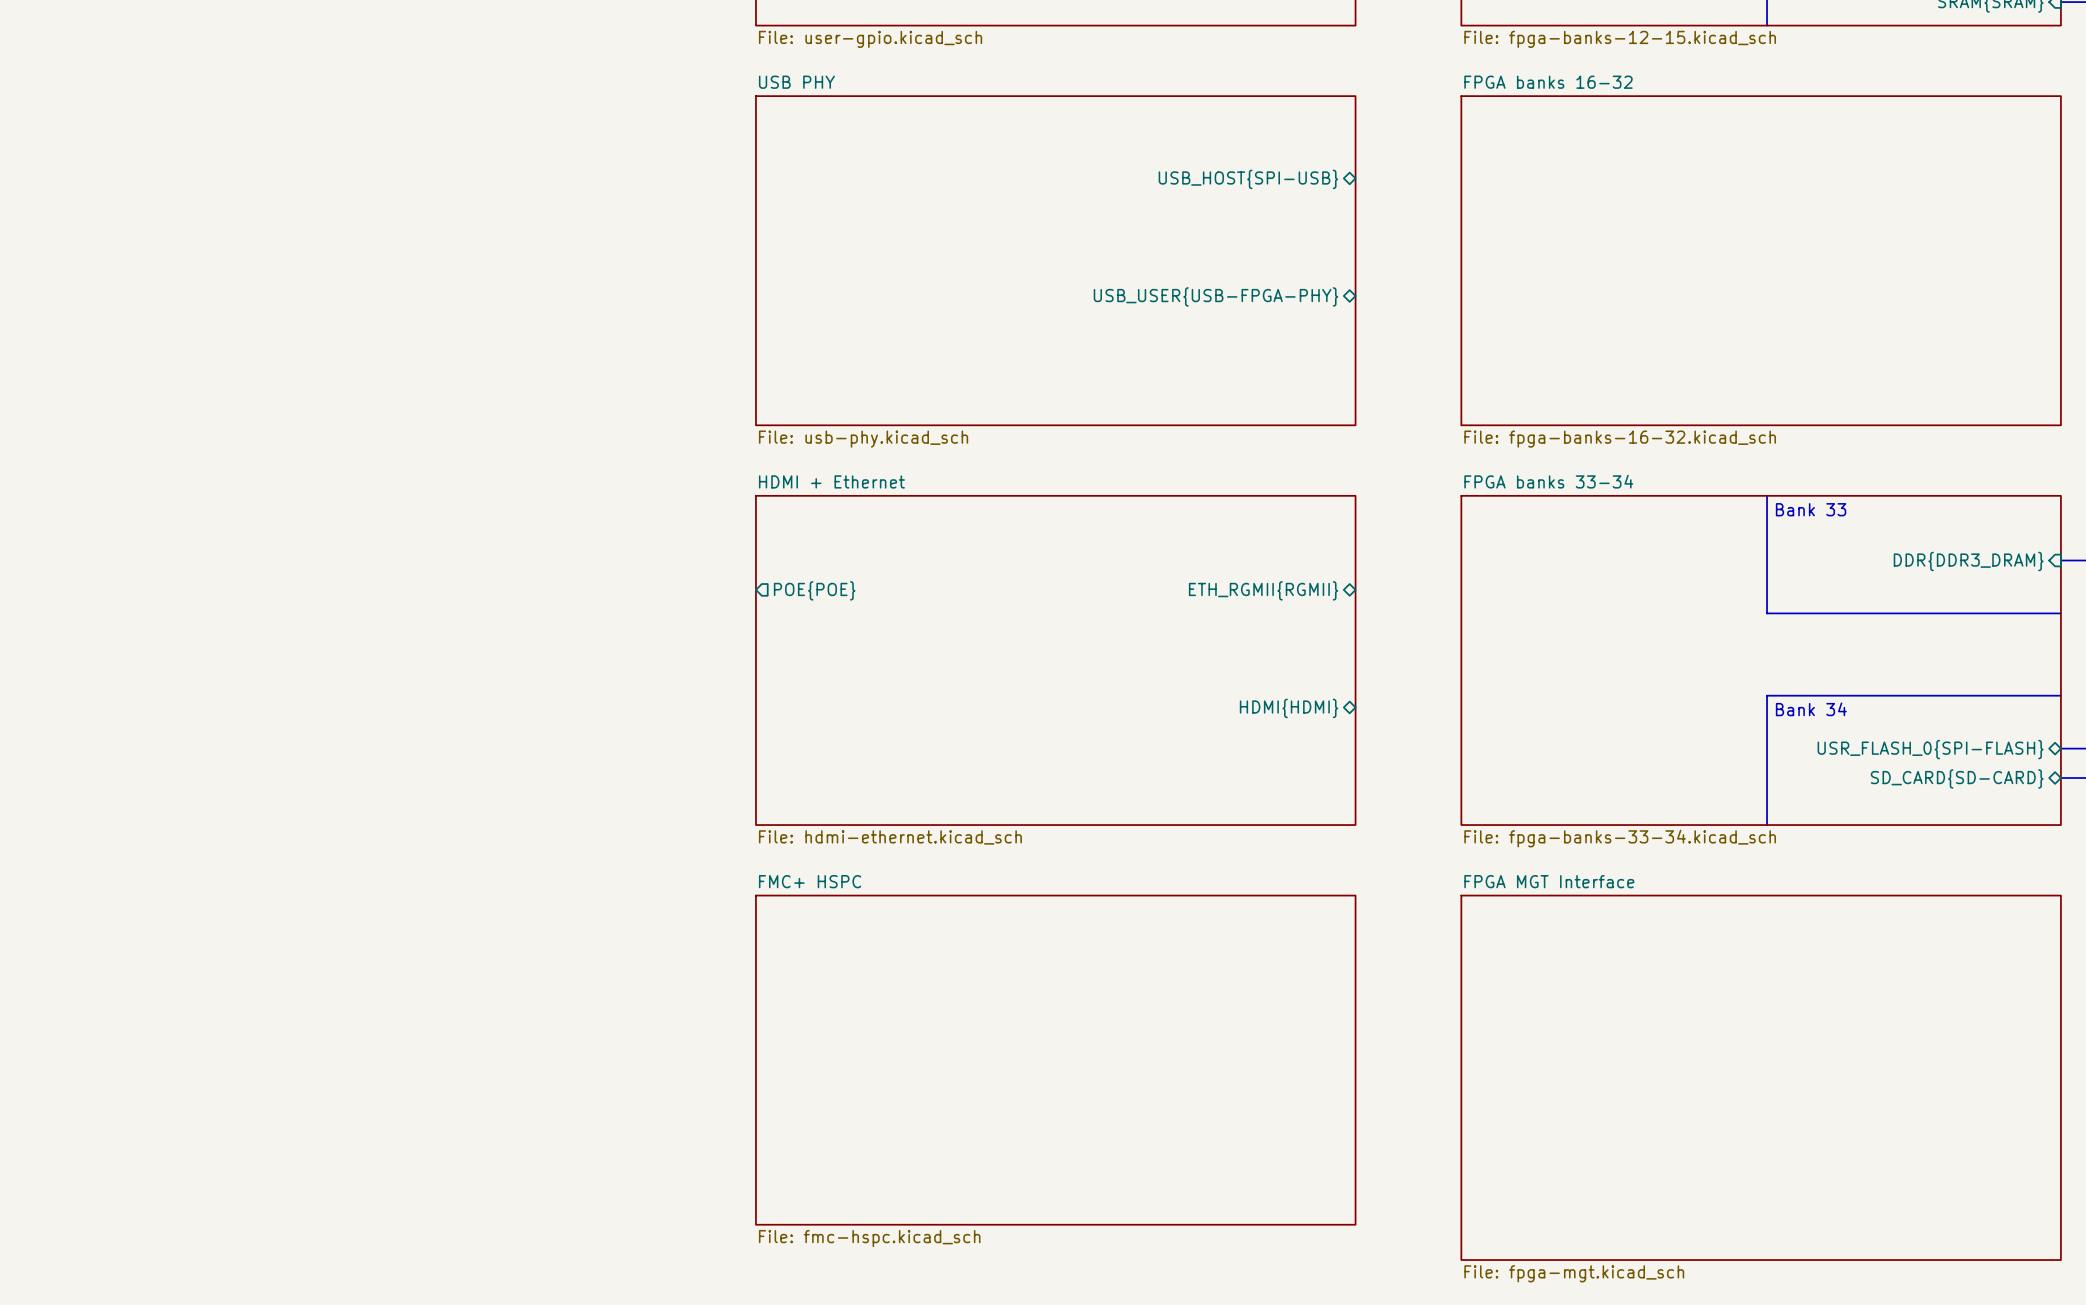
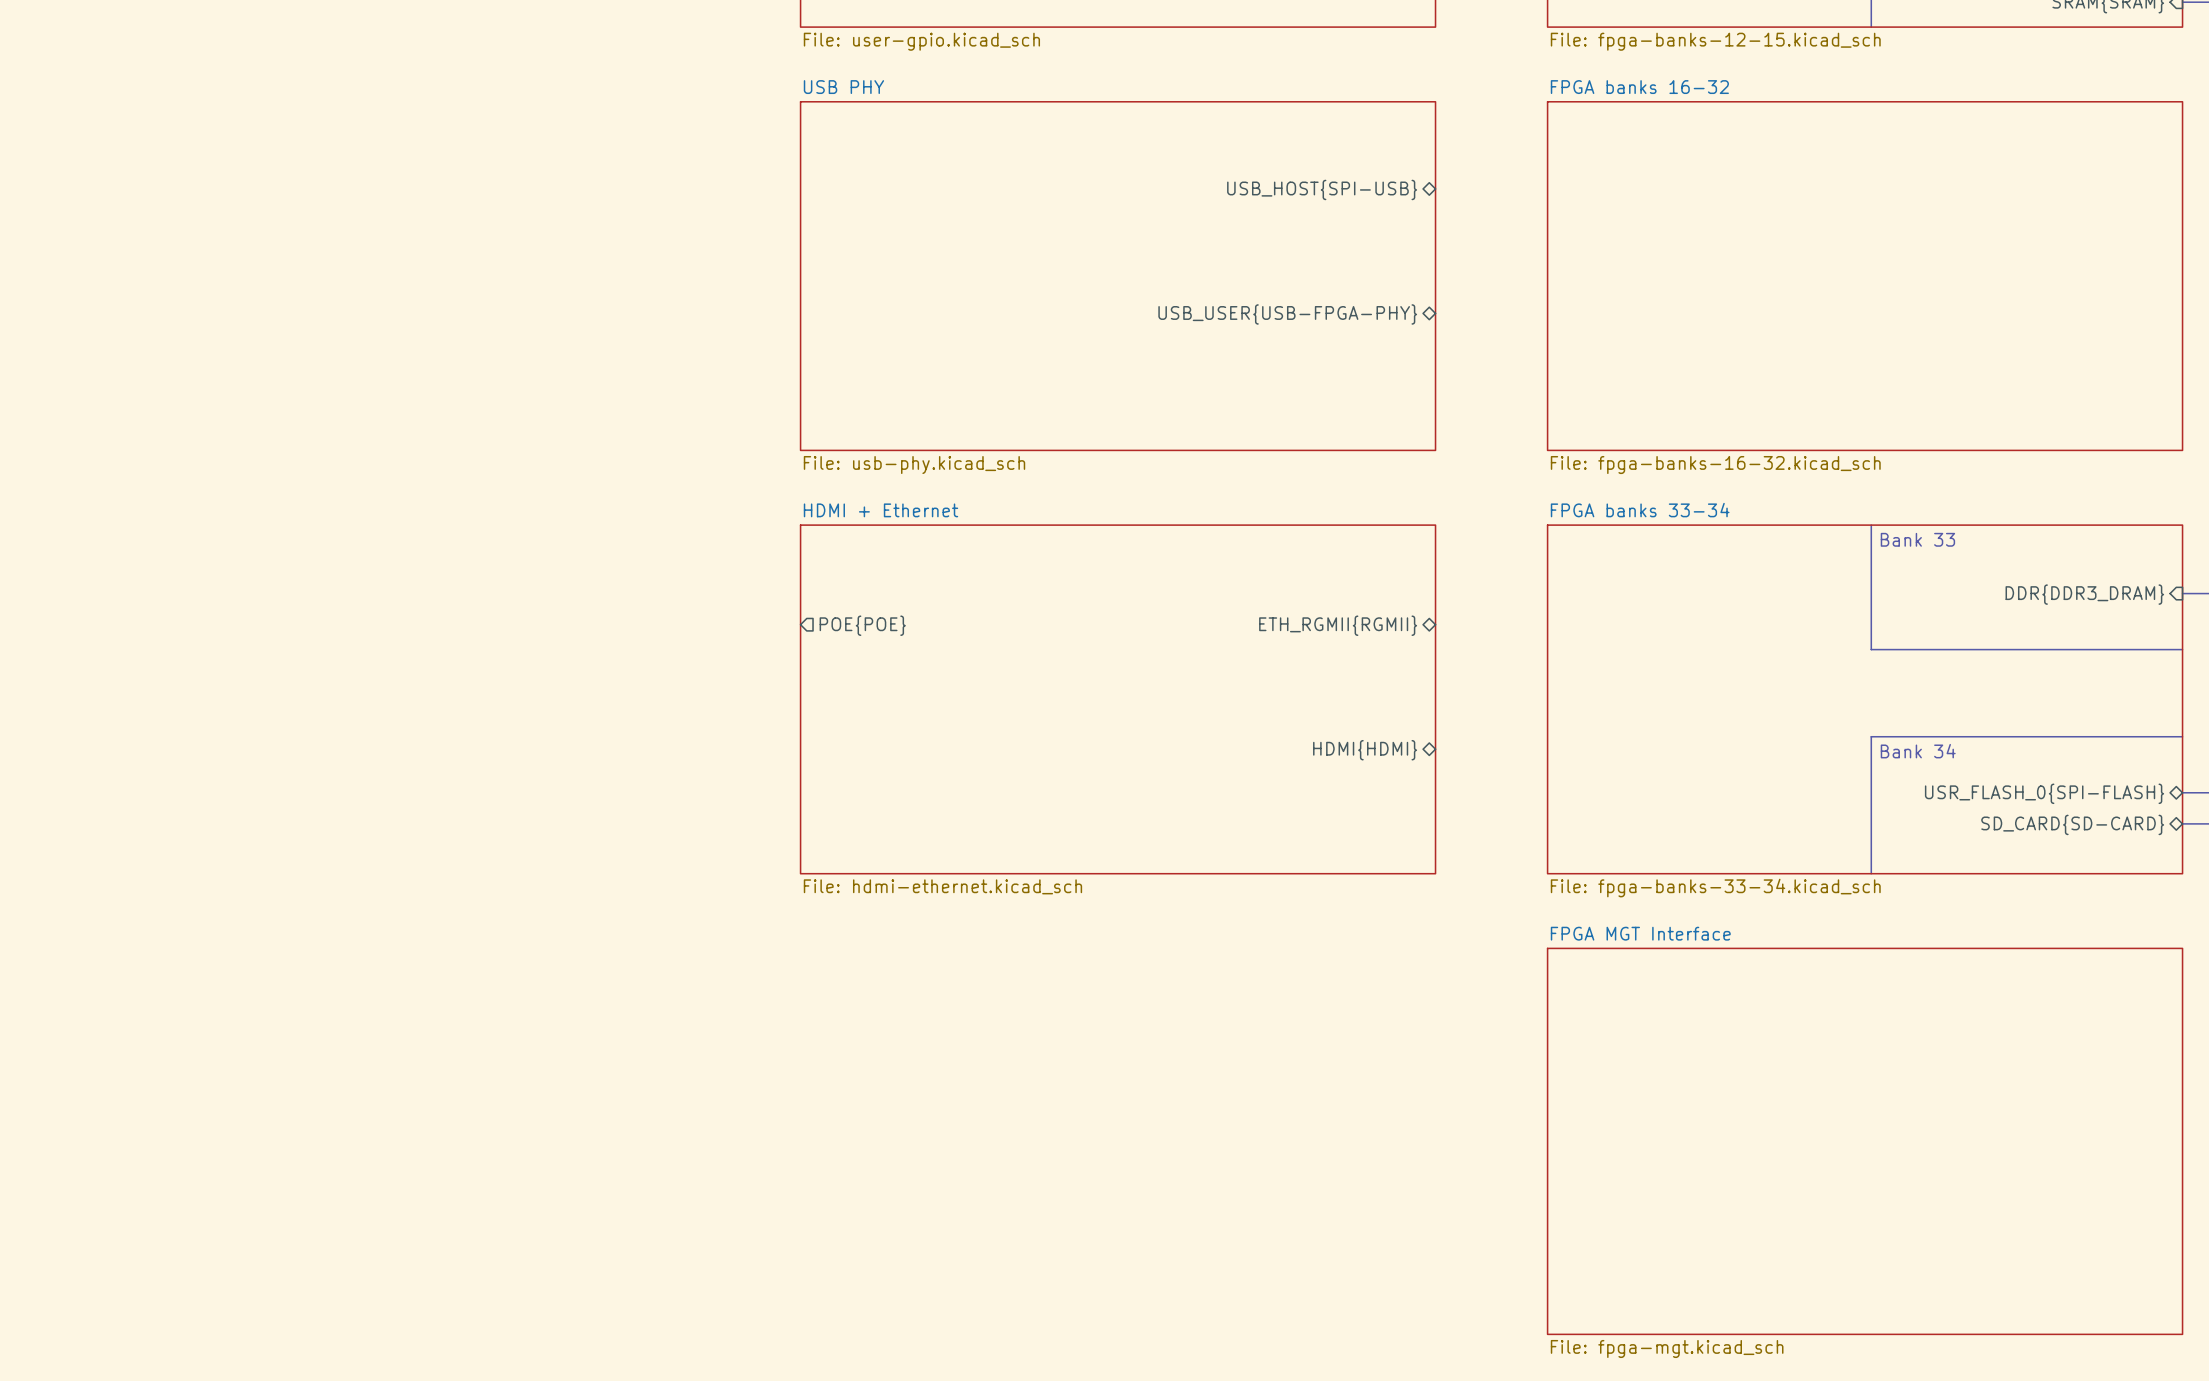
sheet FMC+ HSPC: File: fmc-hspc.kicad_sch (1055, 1060) -> none

